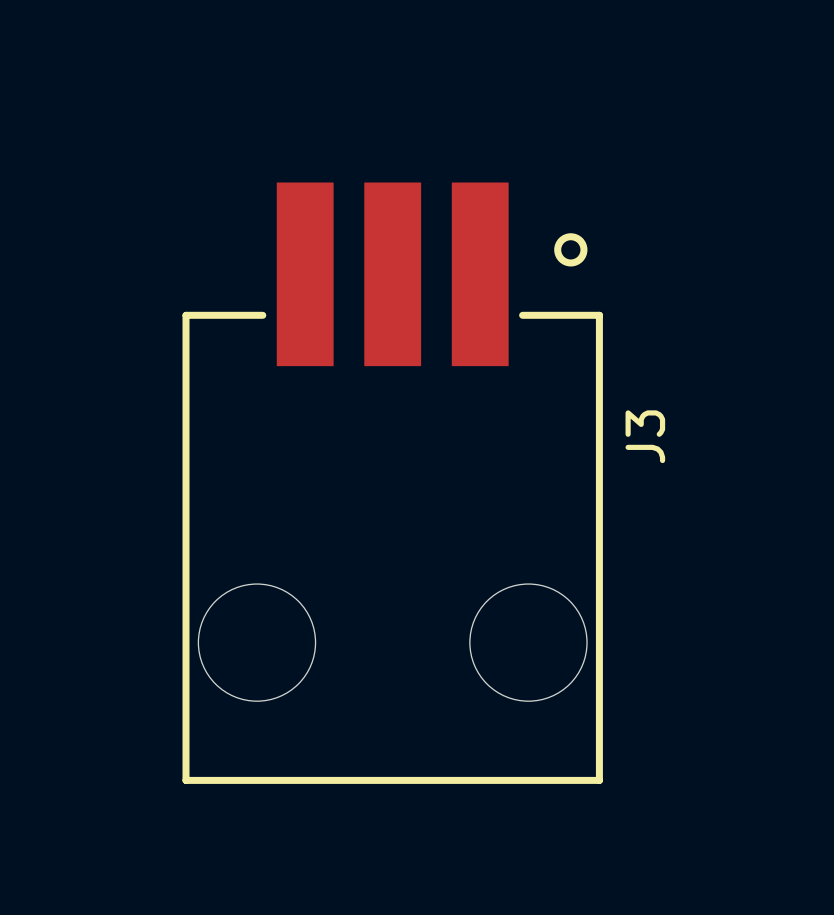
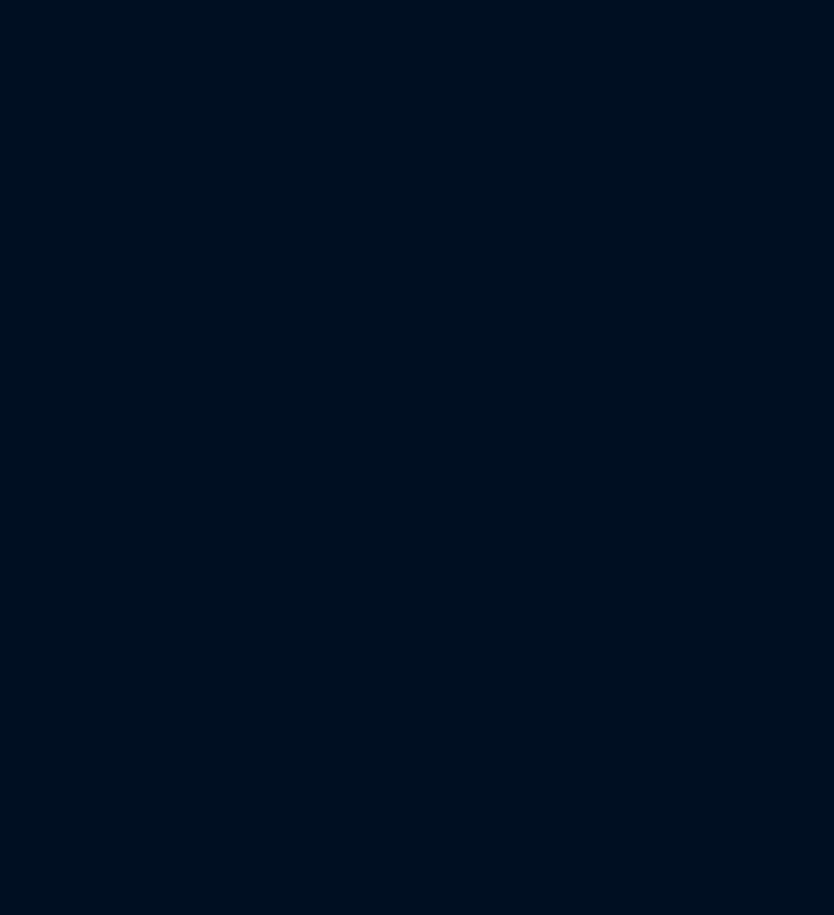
J3: (392, 483) -> none

